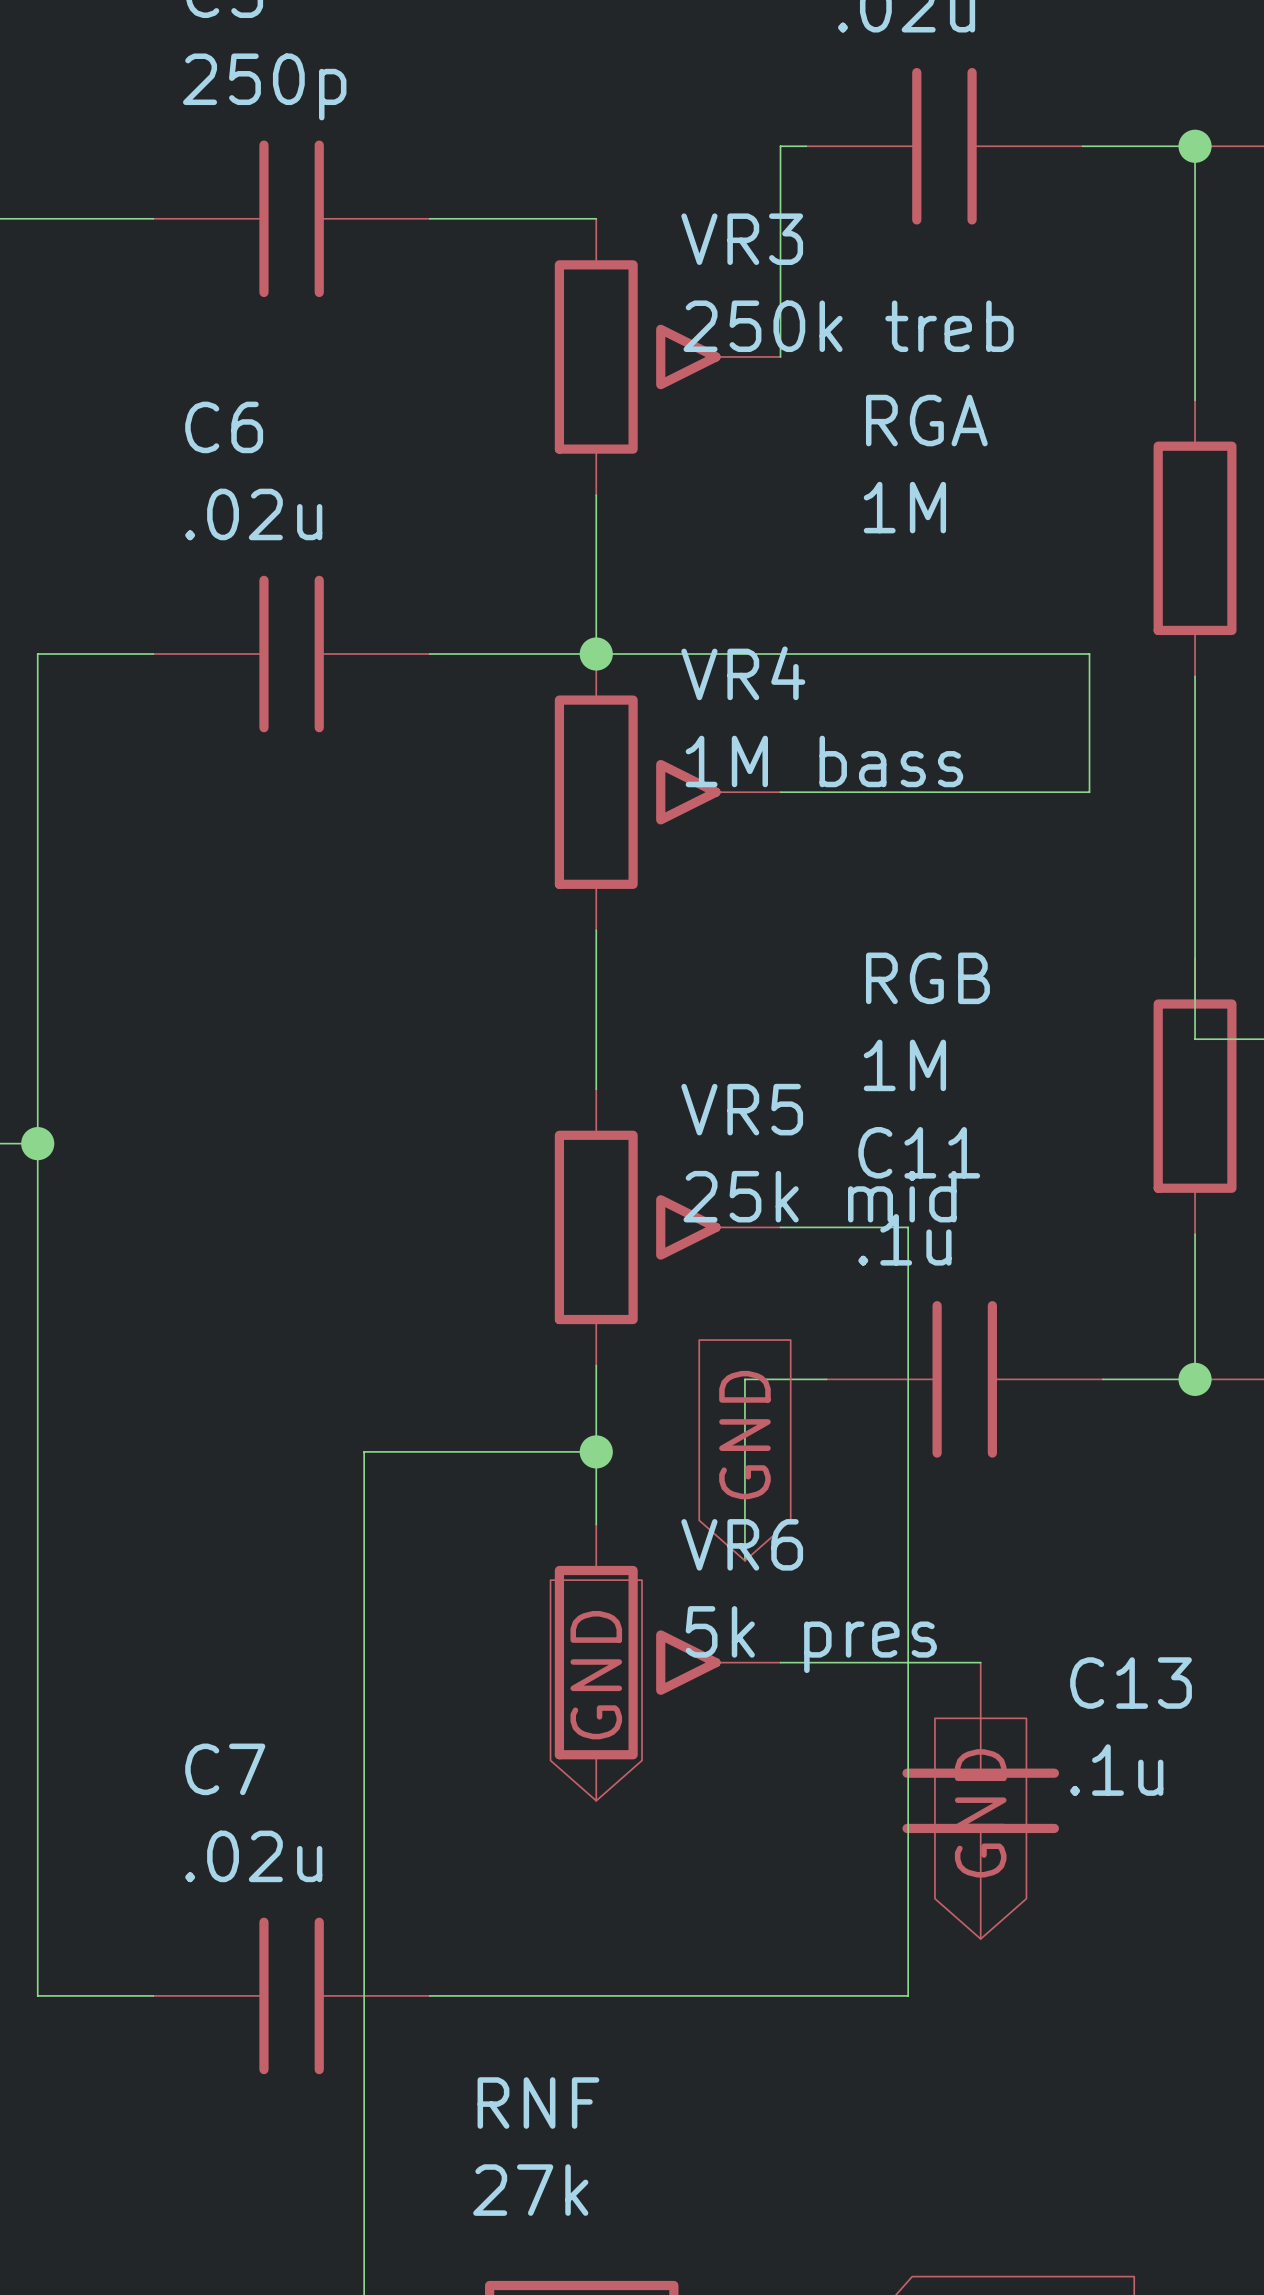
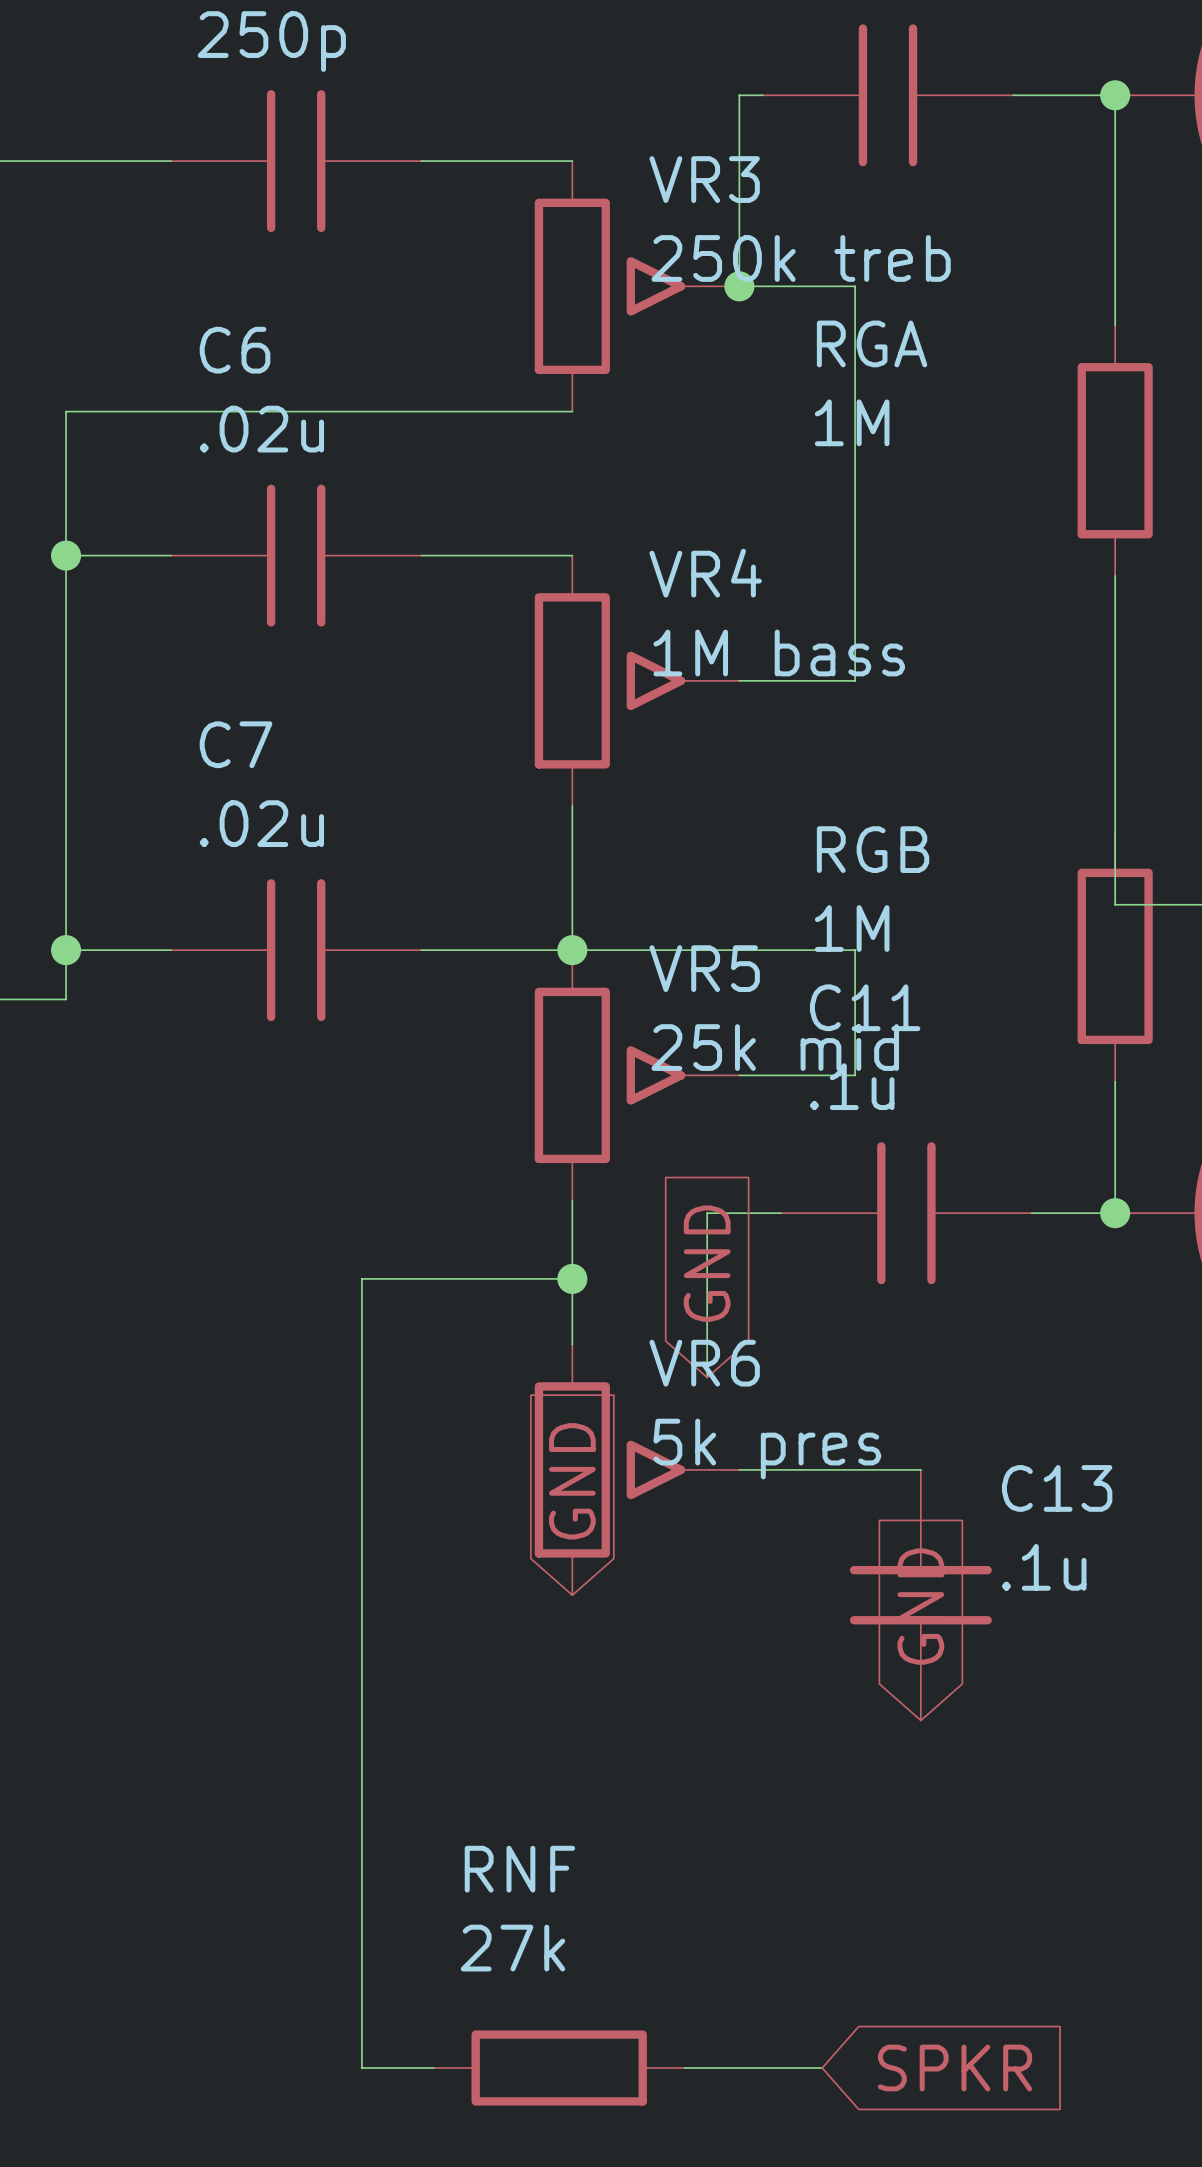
junction: none -> (739, 286)
wire: (596, 495) (596, 654) (1089, 654) (1089, 792) (908, 792) -> (739, 286) (855, 286) (855, 680)
wire: none -> (572, 411) (66, 411) (66, 555)
junction: none -> (66, 555)
junction: (596, 654) -> none
wire: none -> (66, 950) (170, 950)
junction: none -> (572, 950)
wire: (37, 1143) (37, 1995) (153, 1995) -> none
junction position: (37, 1143) -> (66, 950)
wire: (908, 1227) (908, 1995) (429, 1995) -> (855, 1075) (855, 950) (421, 950)
C7 position: (291, 1995) -> (296, 950)

